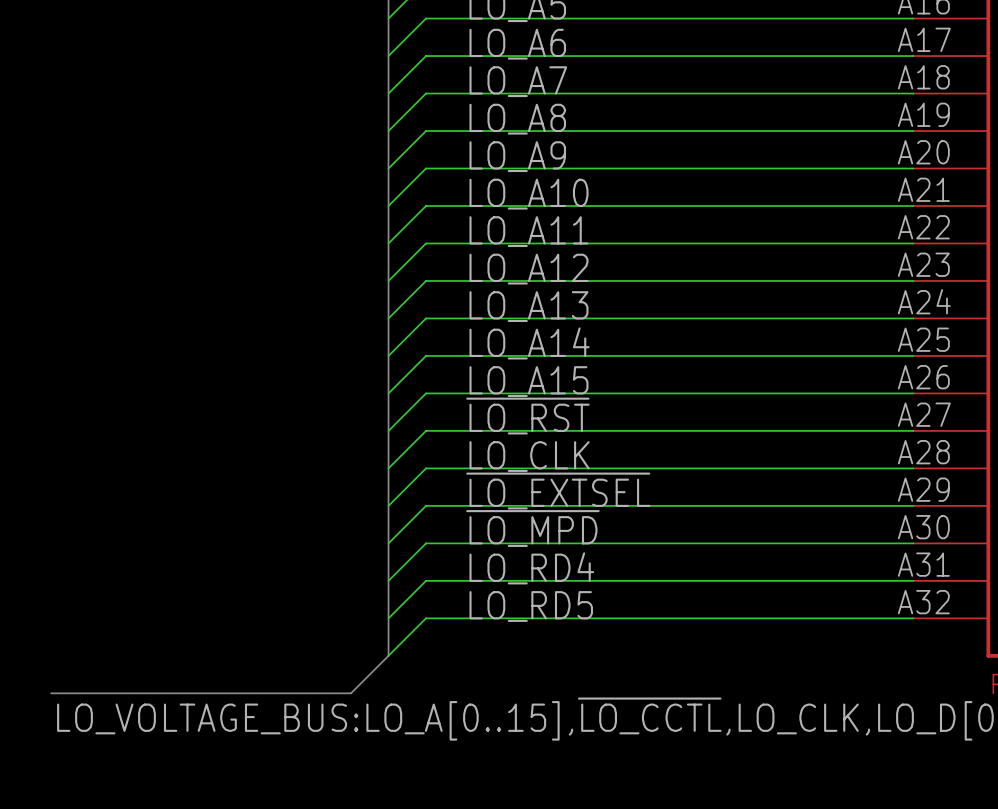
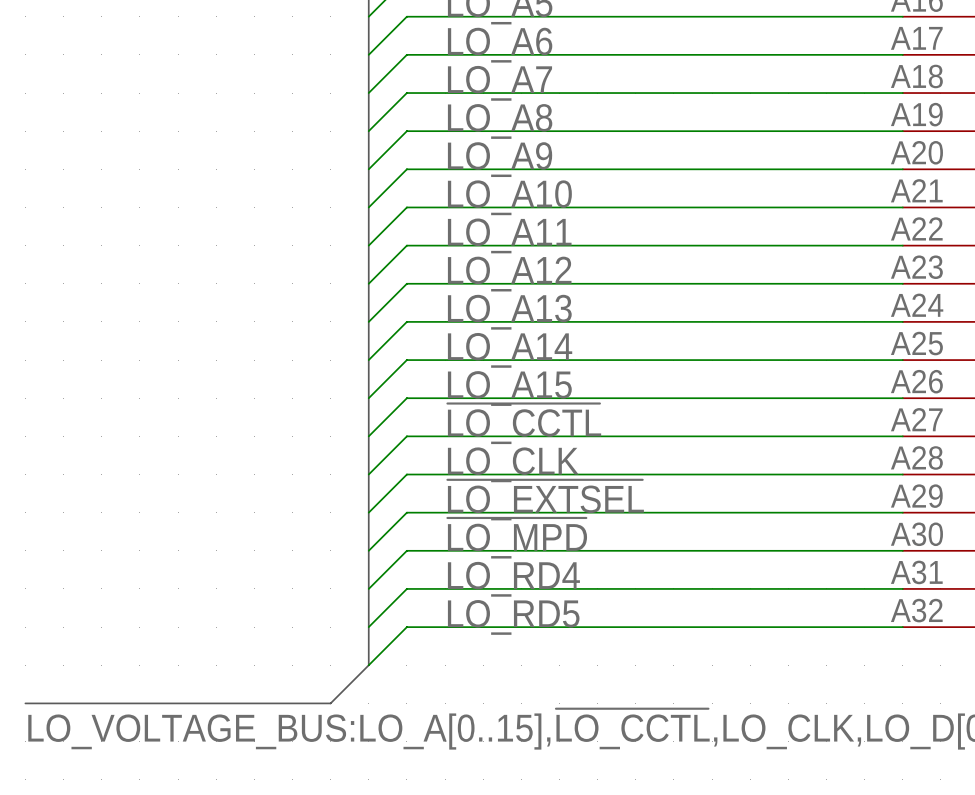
label: ~{LO_RST} (527, 416) -> ~{LO_CCTL} (524, 423)

